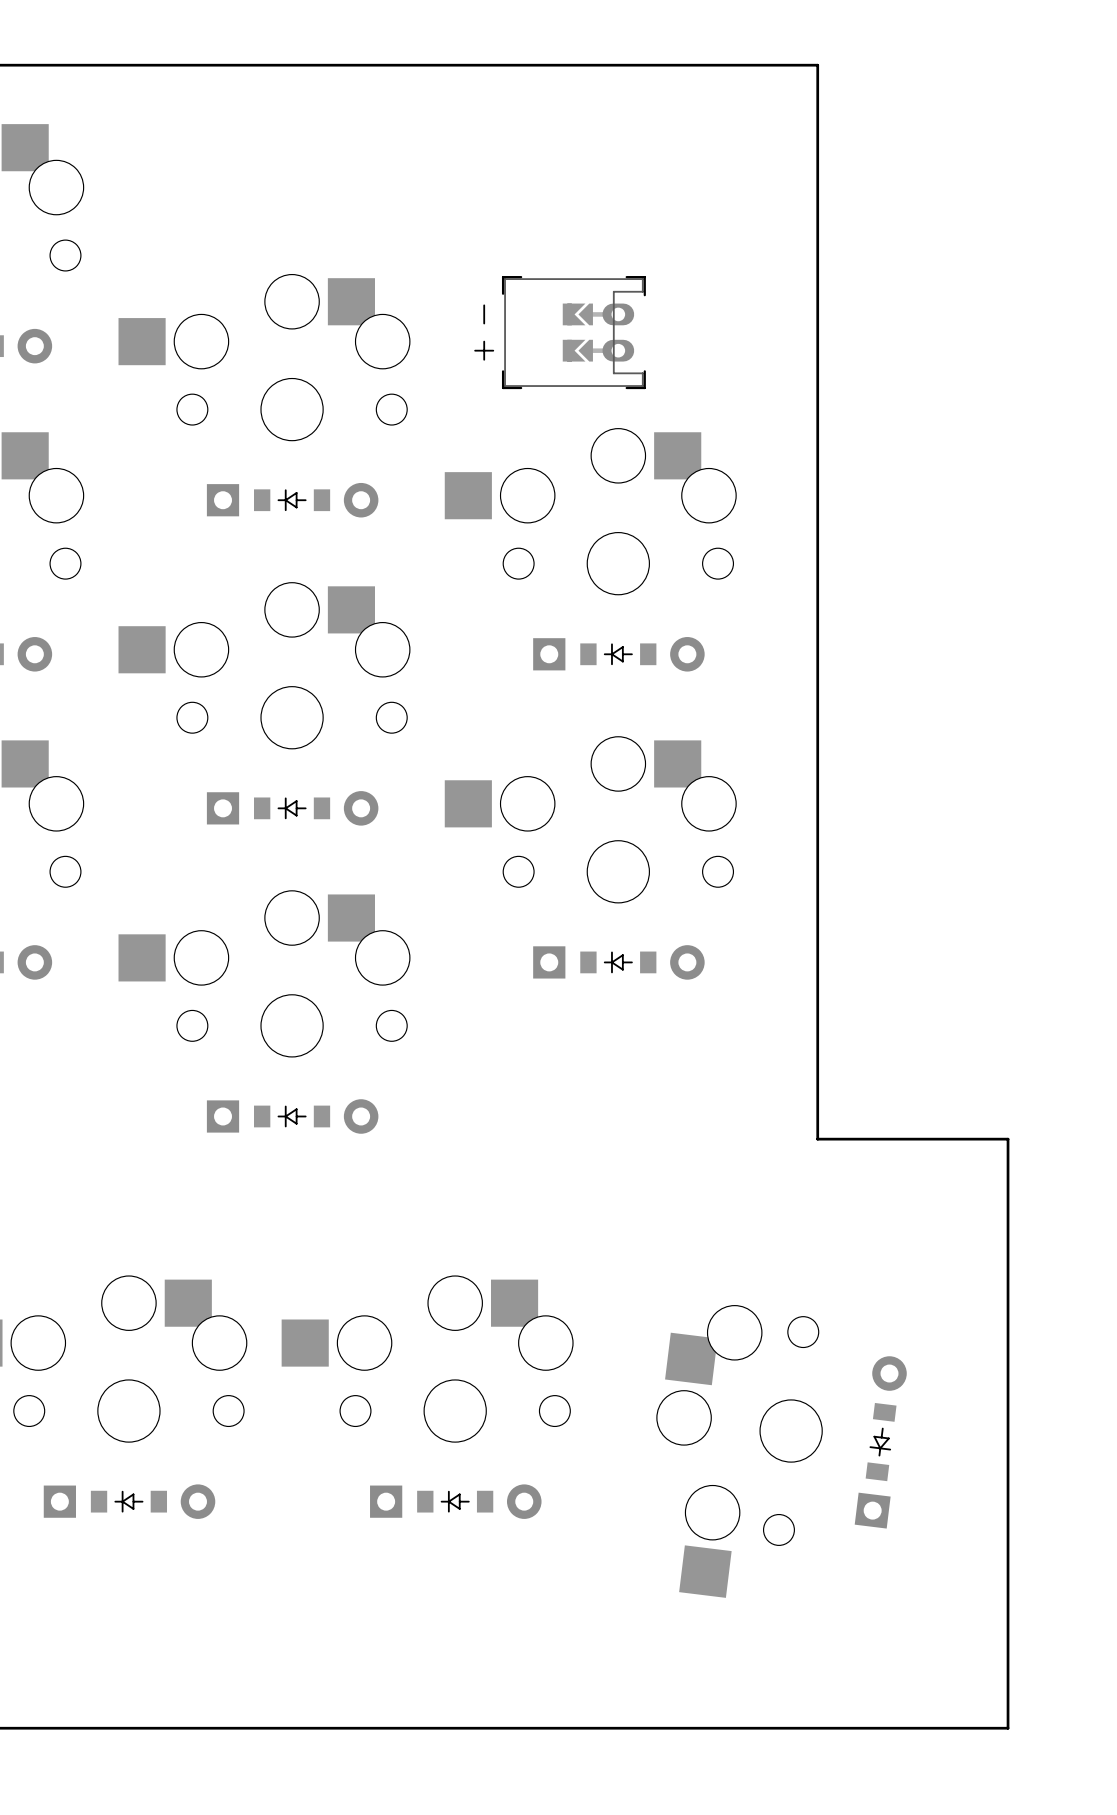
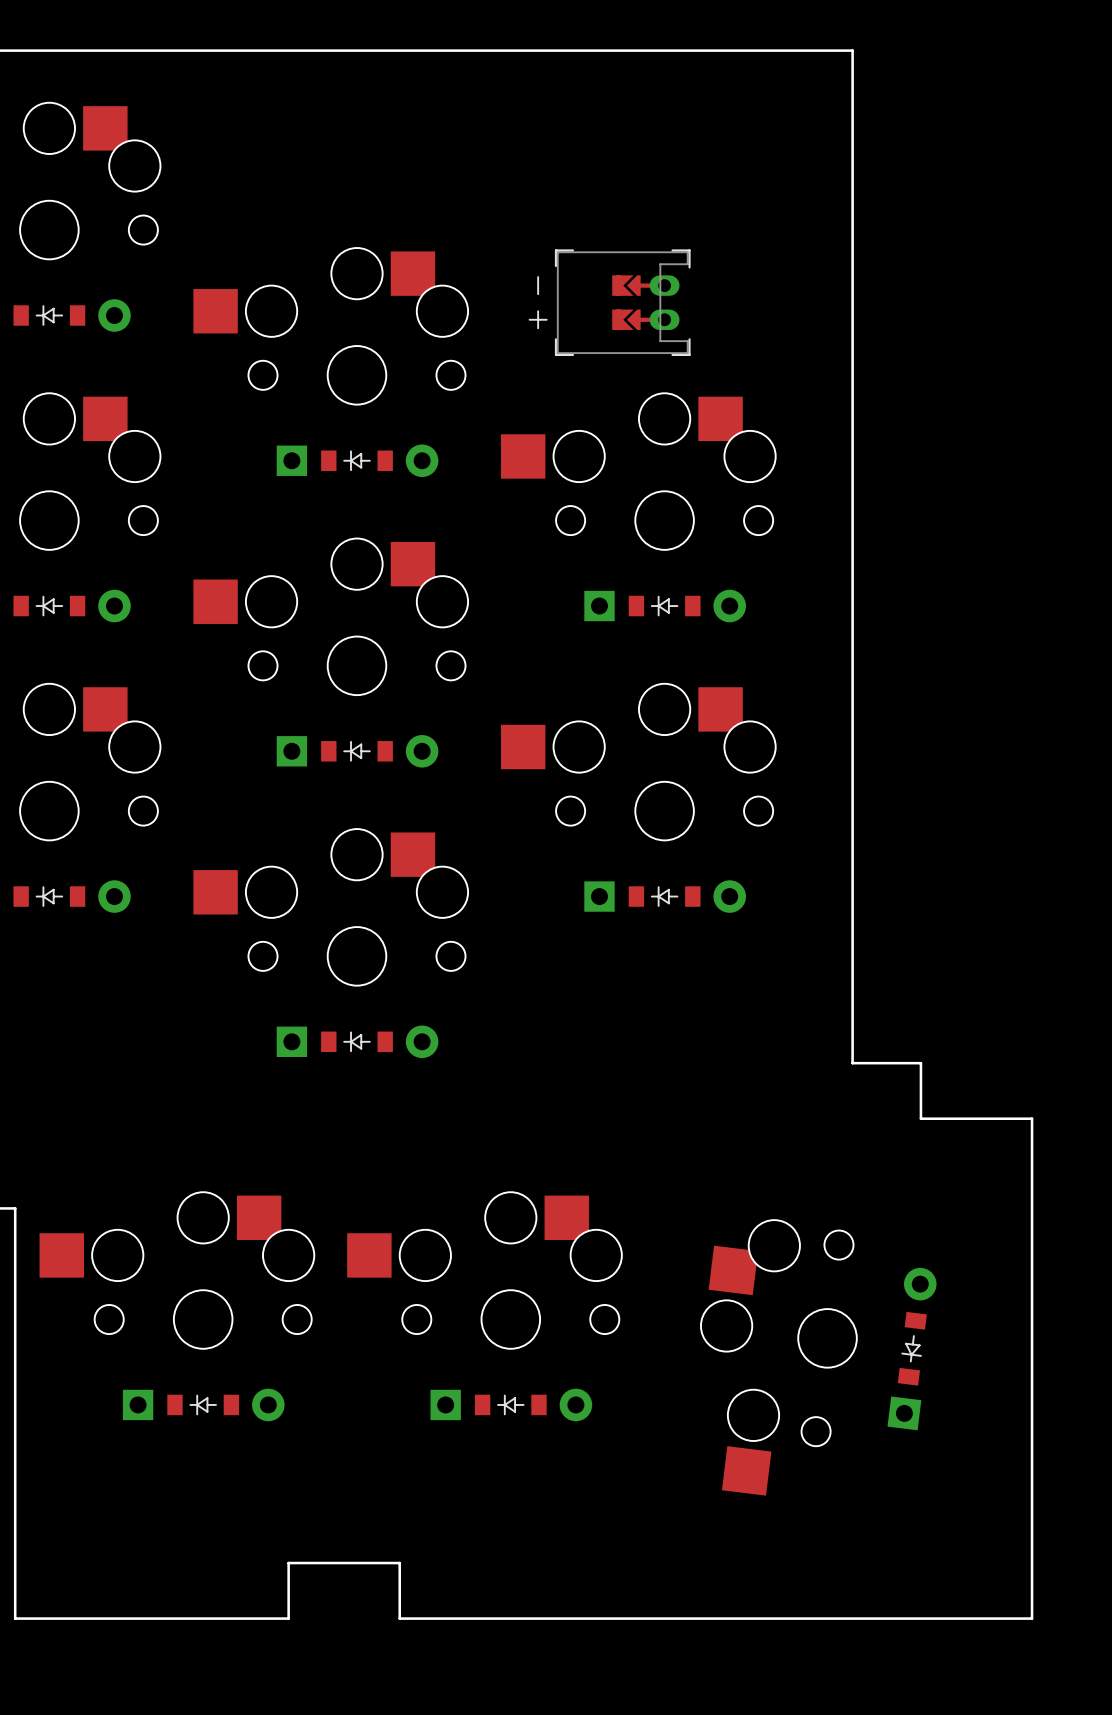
board edge: (890, 1139) (1008, 1139) (1008, 1198) -> (920, 1063) (920, 1118) (1032, 1118)
board edge: (219, 1728) (337, 1728) -> (288, 1618) (288, 1563) (399, 1563) (399, 1618)

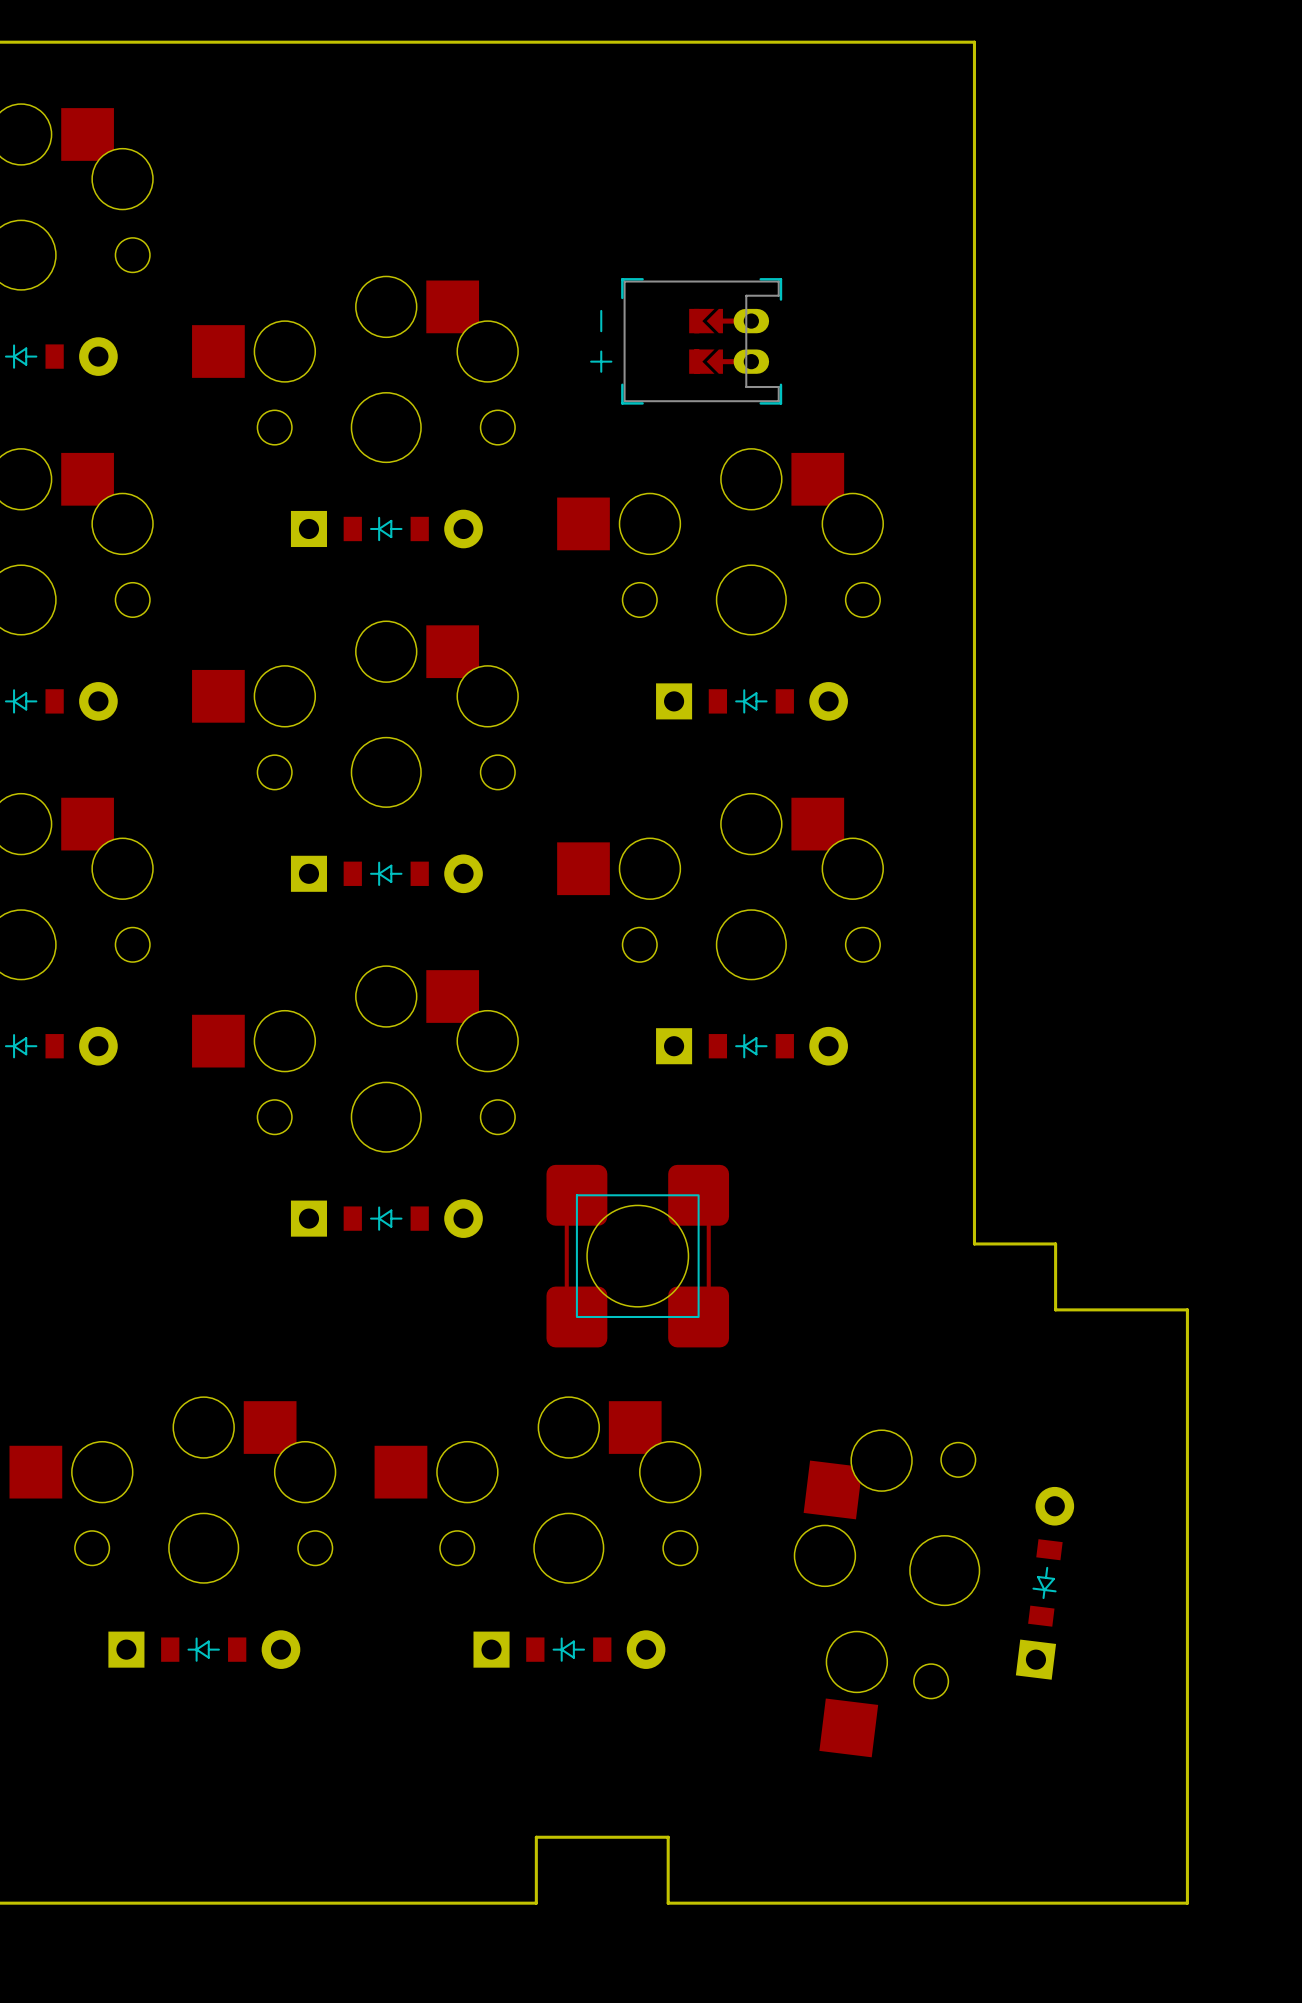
part: none -> (637, 1256)
board edge: (288, 1618) (288, 1563) (399, 1563) (399, 1618) -> (305, 1903) (436, 1903)
board edge: (483, 1618) (594, 1618) -> (536, 1903) (536, 1837) (668, 1837) (668, 1903)

